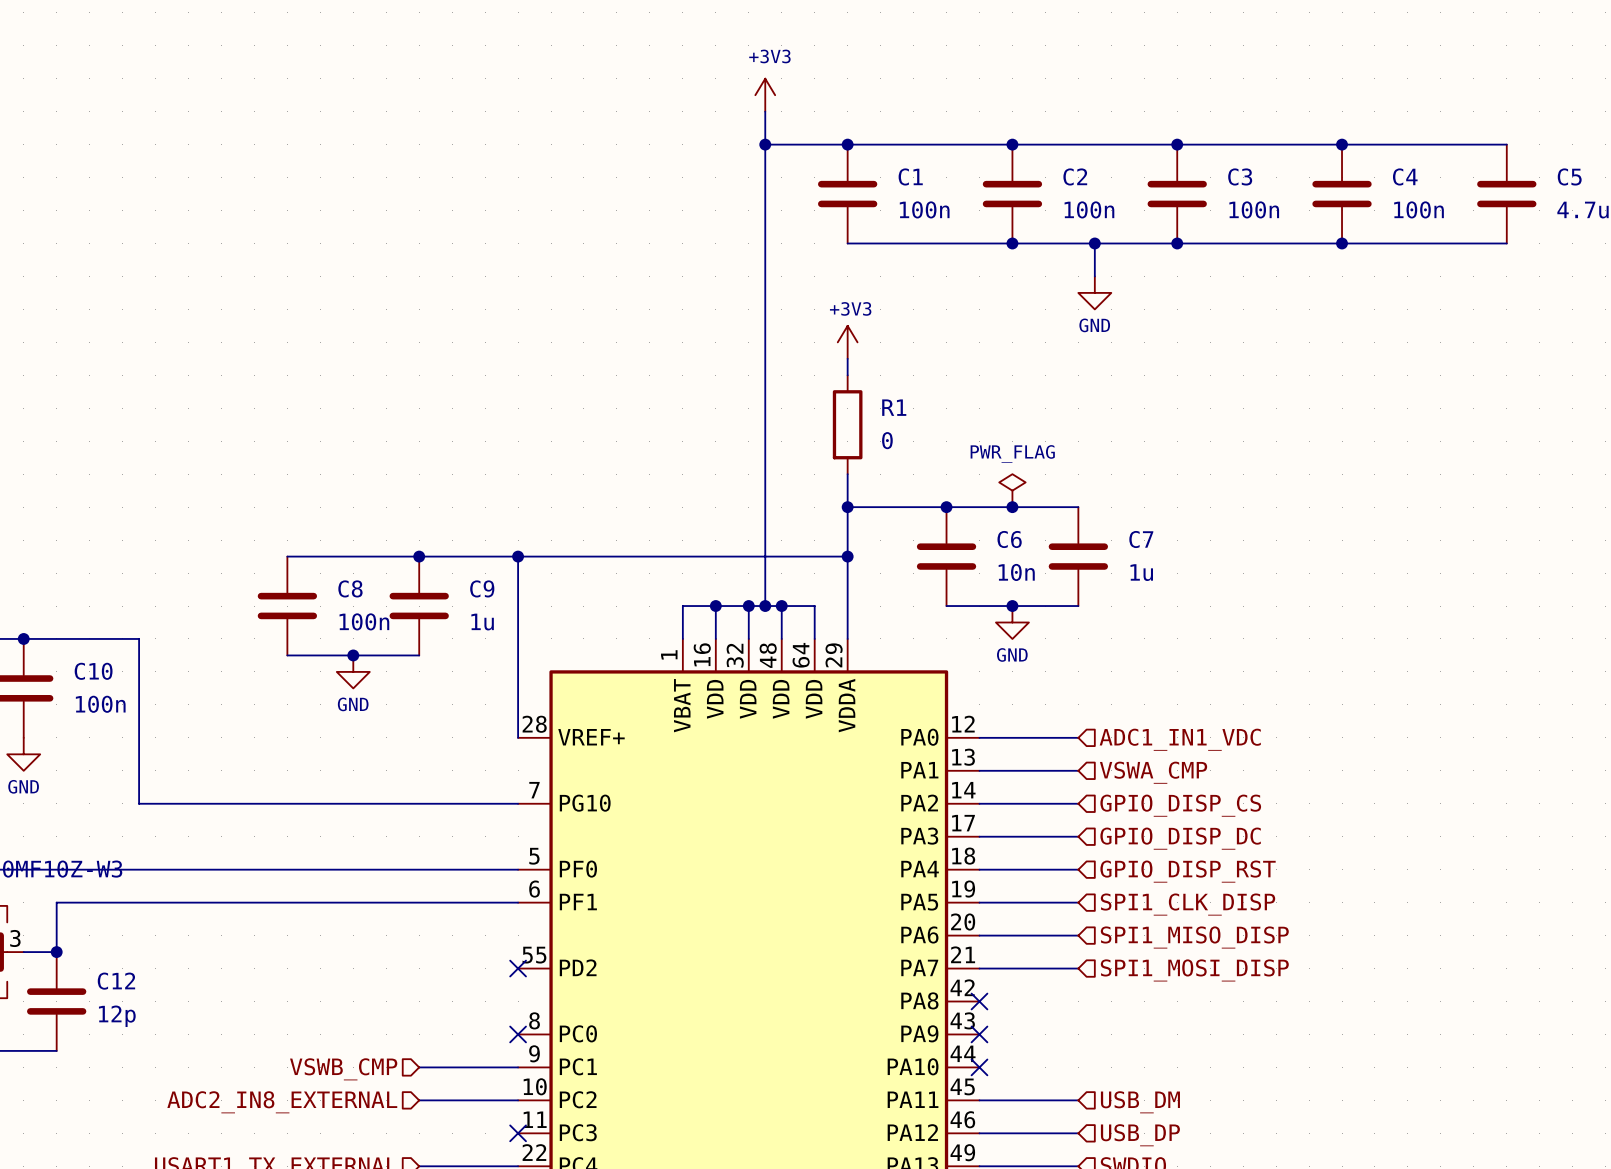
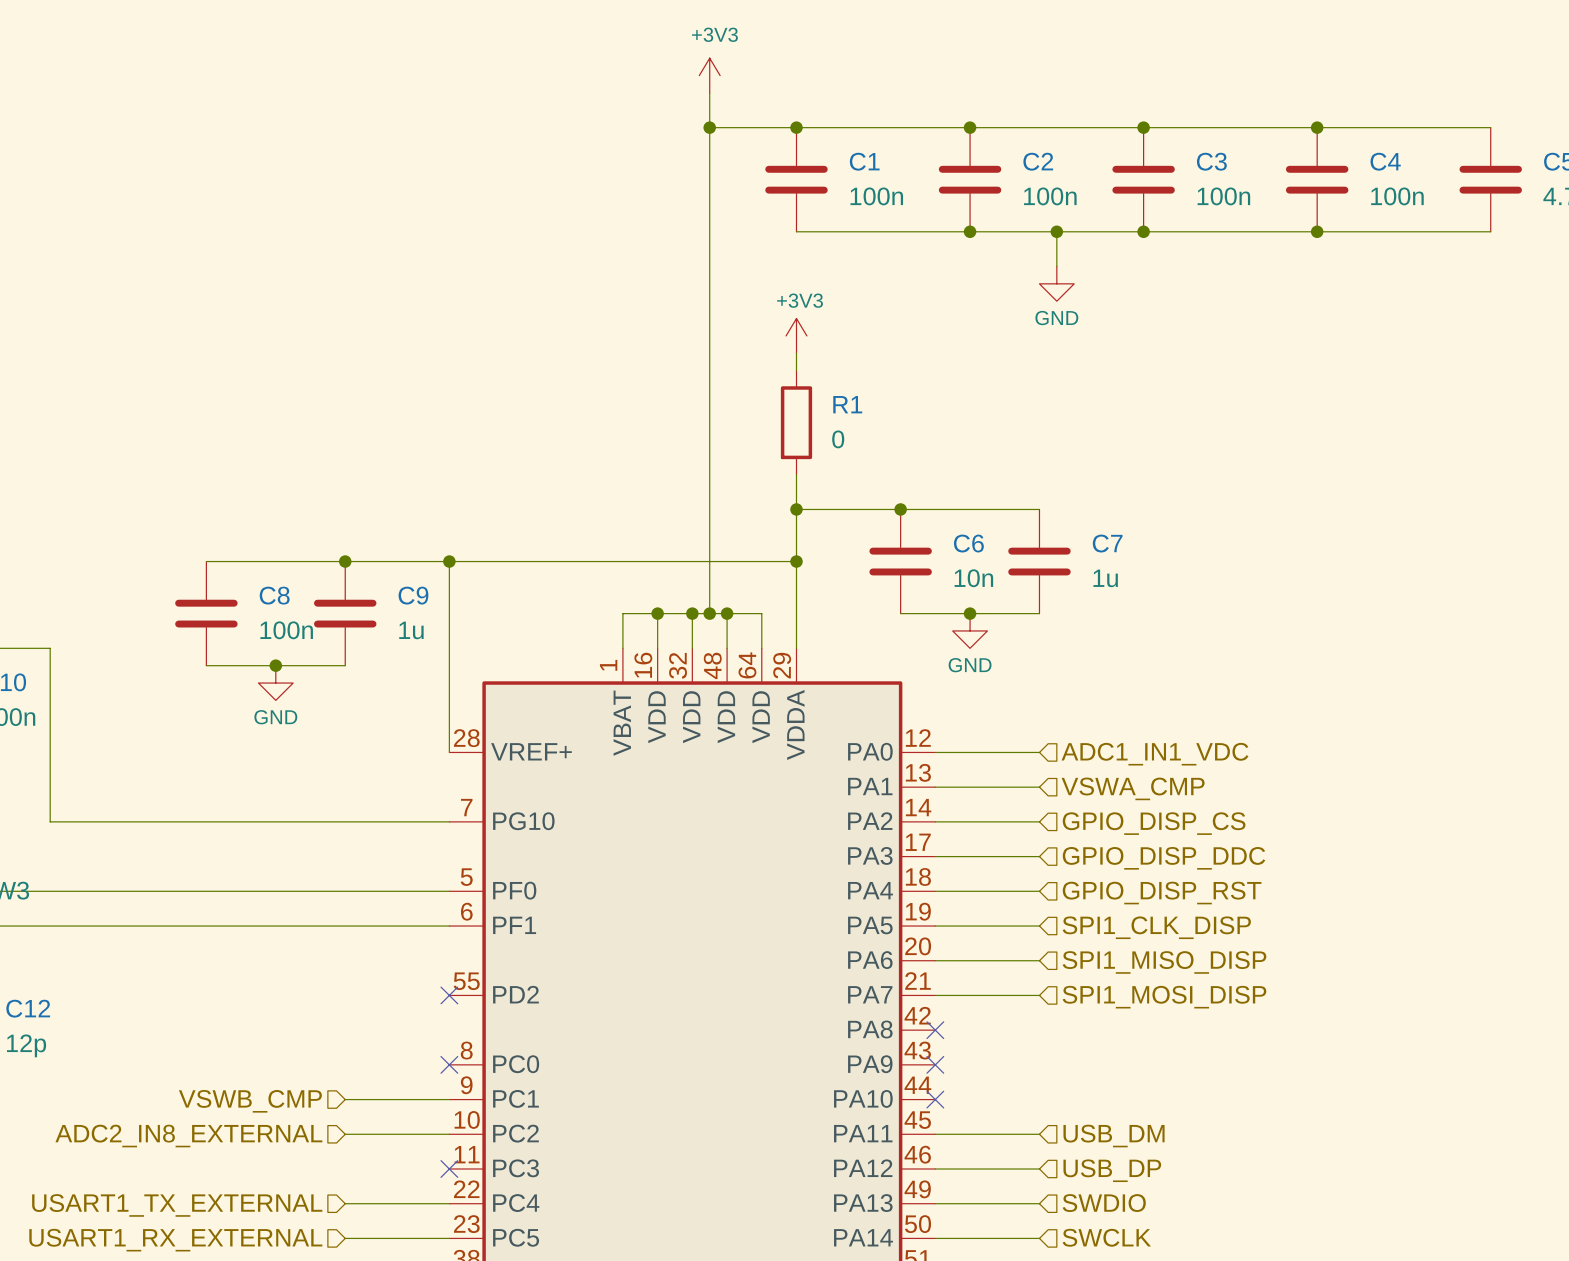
power symbol: PWR_FLAG (1012, 490) -> none
junction: (1012, 507) -> none
hierarchical label: GPIO_DISP_DC (1180, 838) -> GPIO_DISP_DDC (1164, 858)

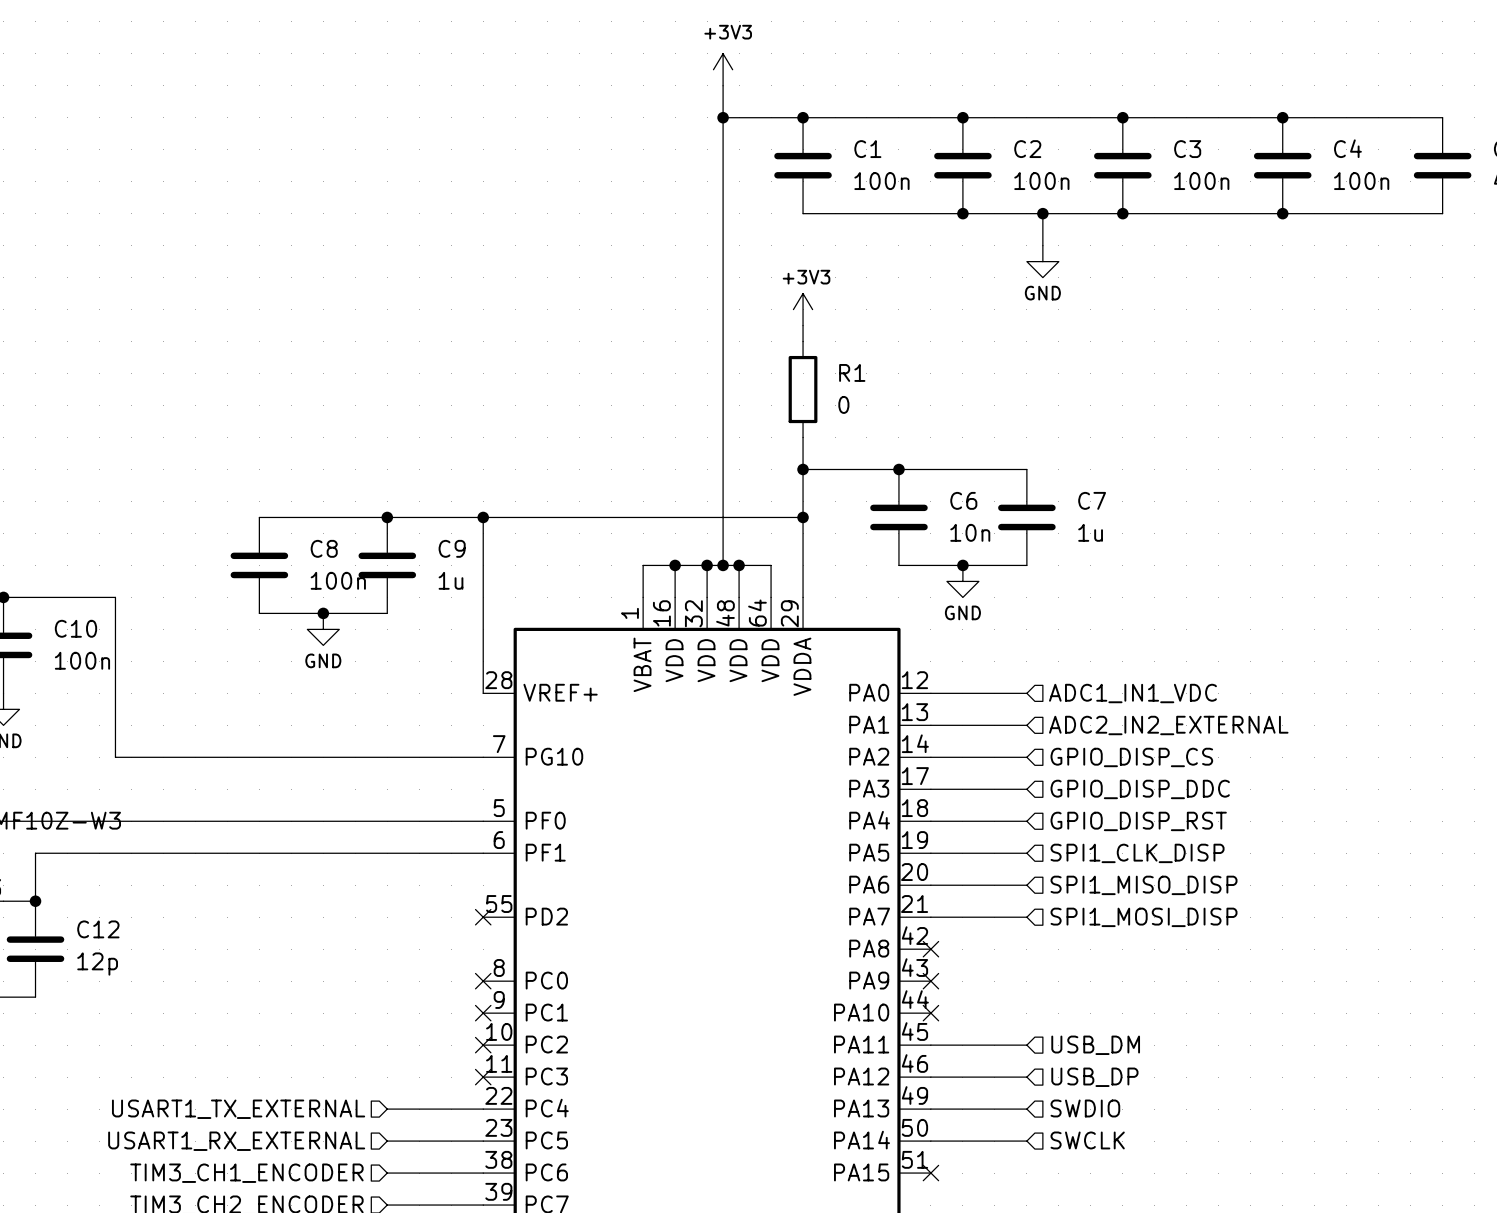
hierarchical label: VSWA_CMP (1133, 788) -> ADC2_IN2_EXTERNAL (1168, 725)
wire: (345, 1099) (449, 1099) -> none
no-connect mark: none -> (483, 1013)
hierarchical label: VSWB_CMP (250, 1101) -> none
wire: (345, 1134) (449, 1134) -> none
no-connect mark: none -> (483, 1045)
hierarchical label: ADC2_IN8_EXTERNAL (188, 1136) -> none

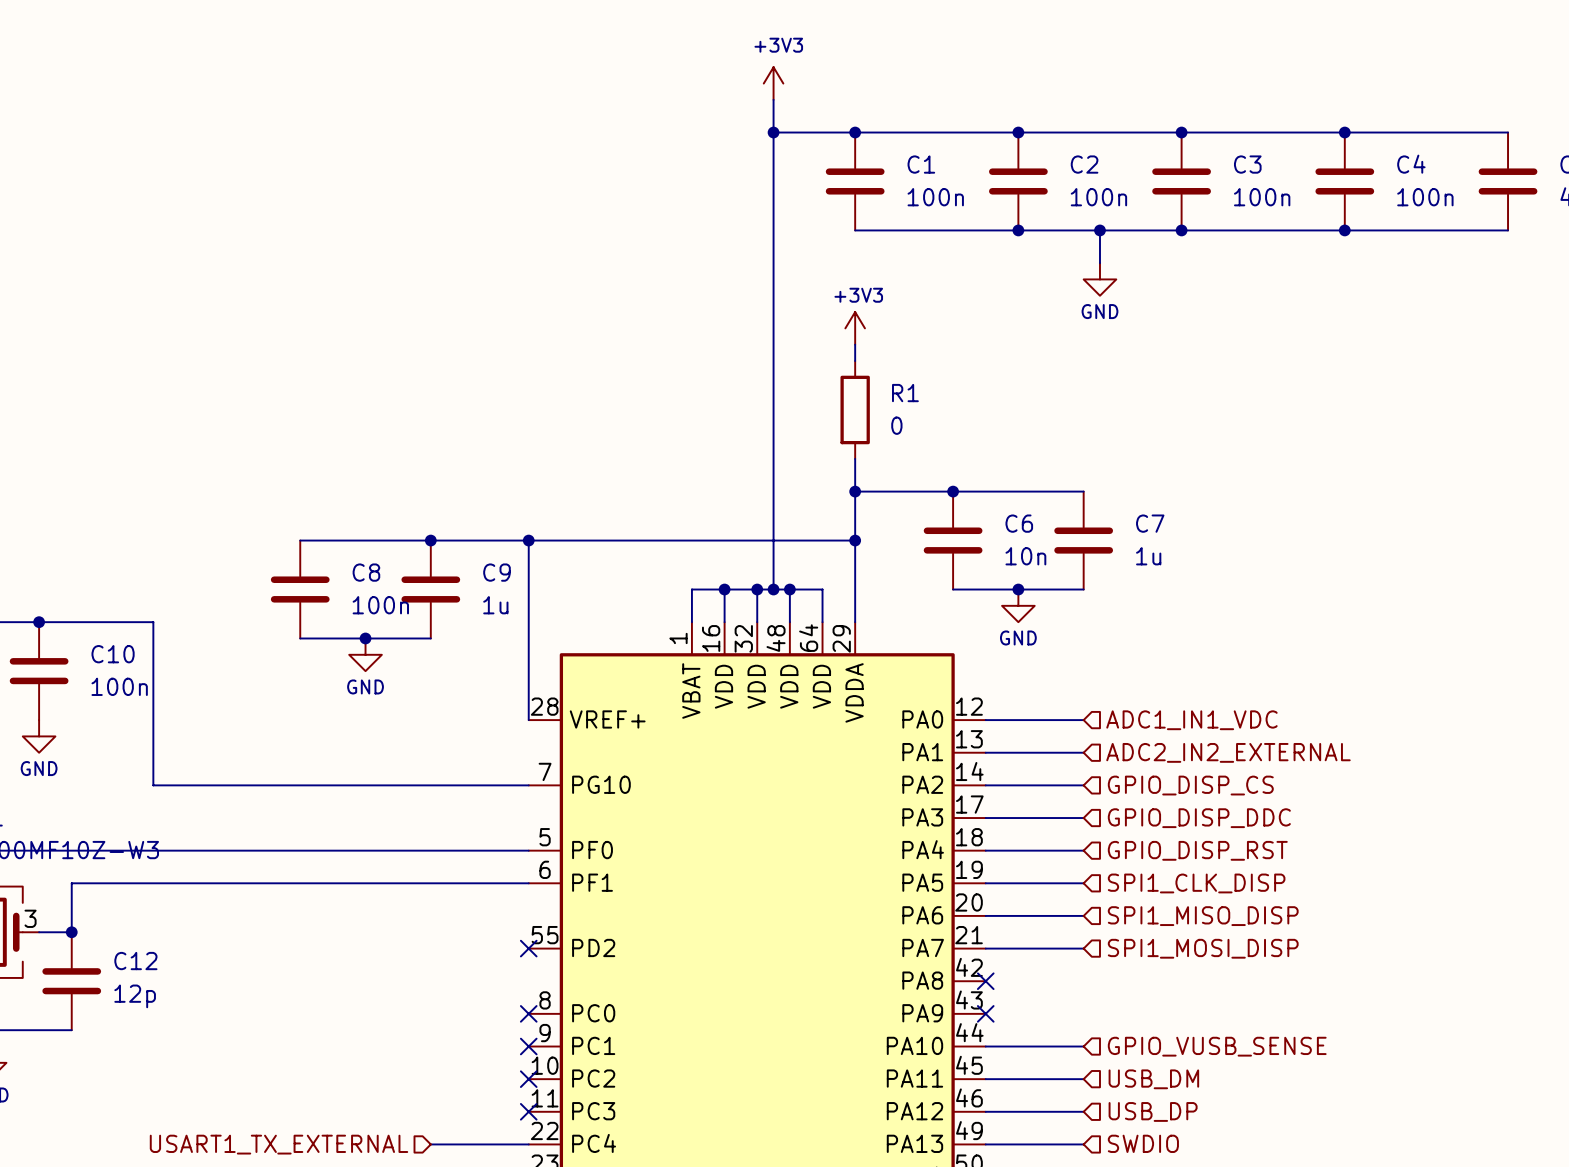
wire: none -> (985, 1046) (1083, 1046)
no-connect mark: (930, 1013) -> none
hierarchical label: none -> GPIO_VUSB_SENSE (1217, 1046)

